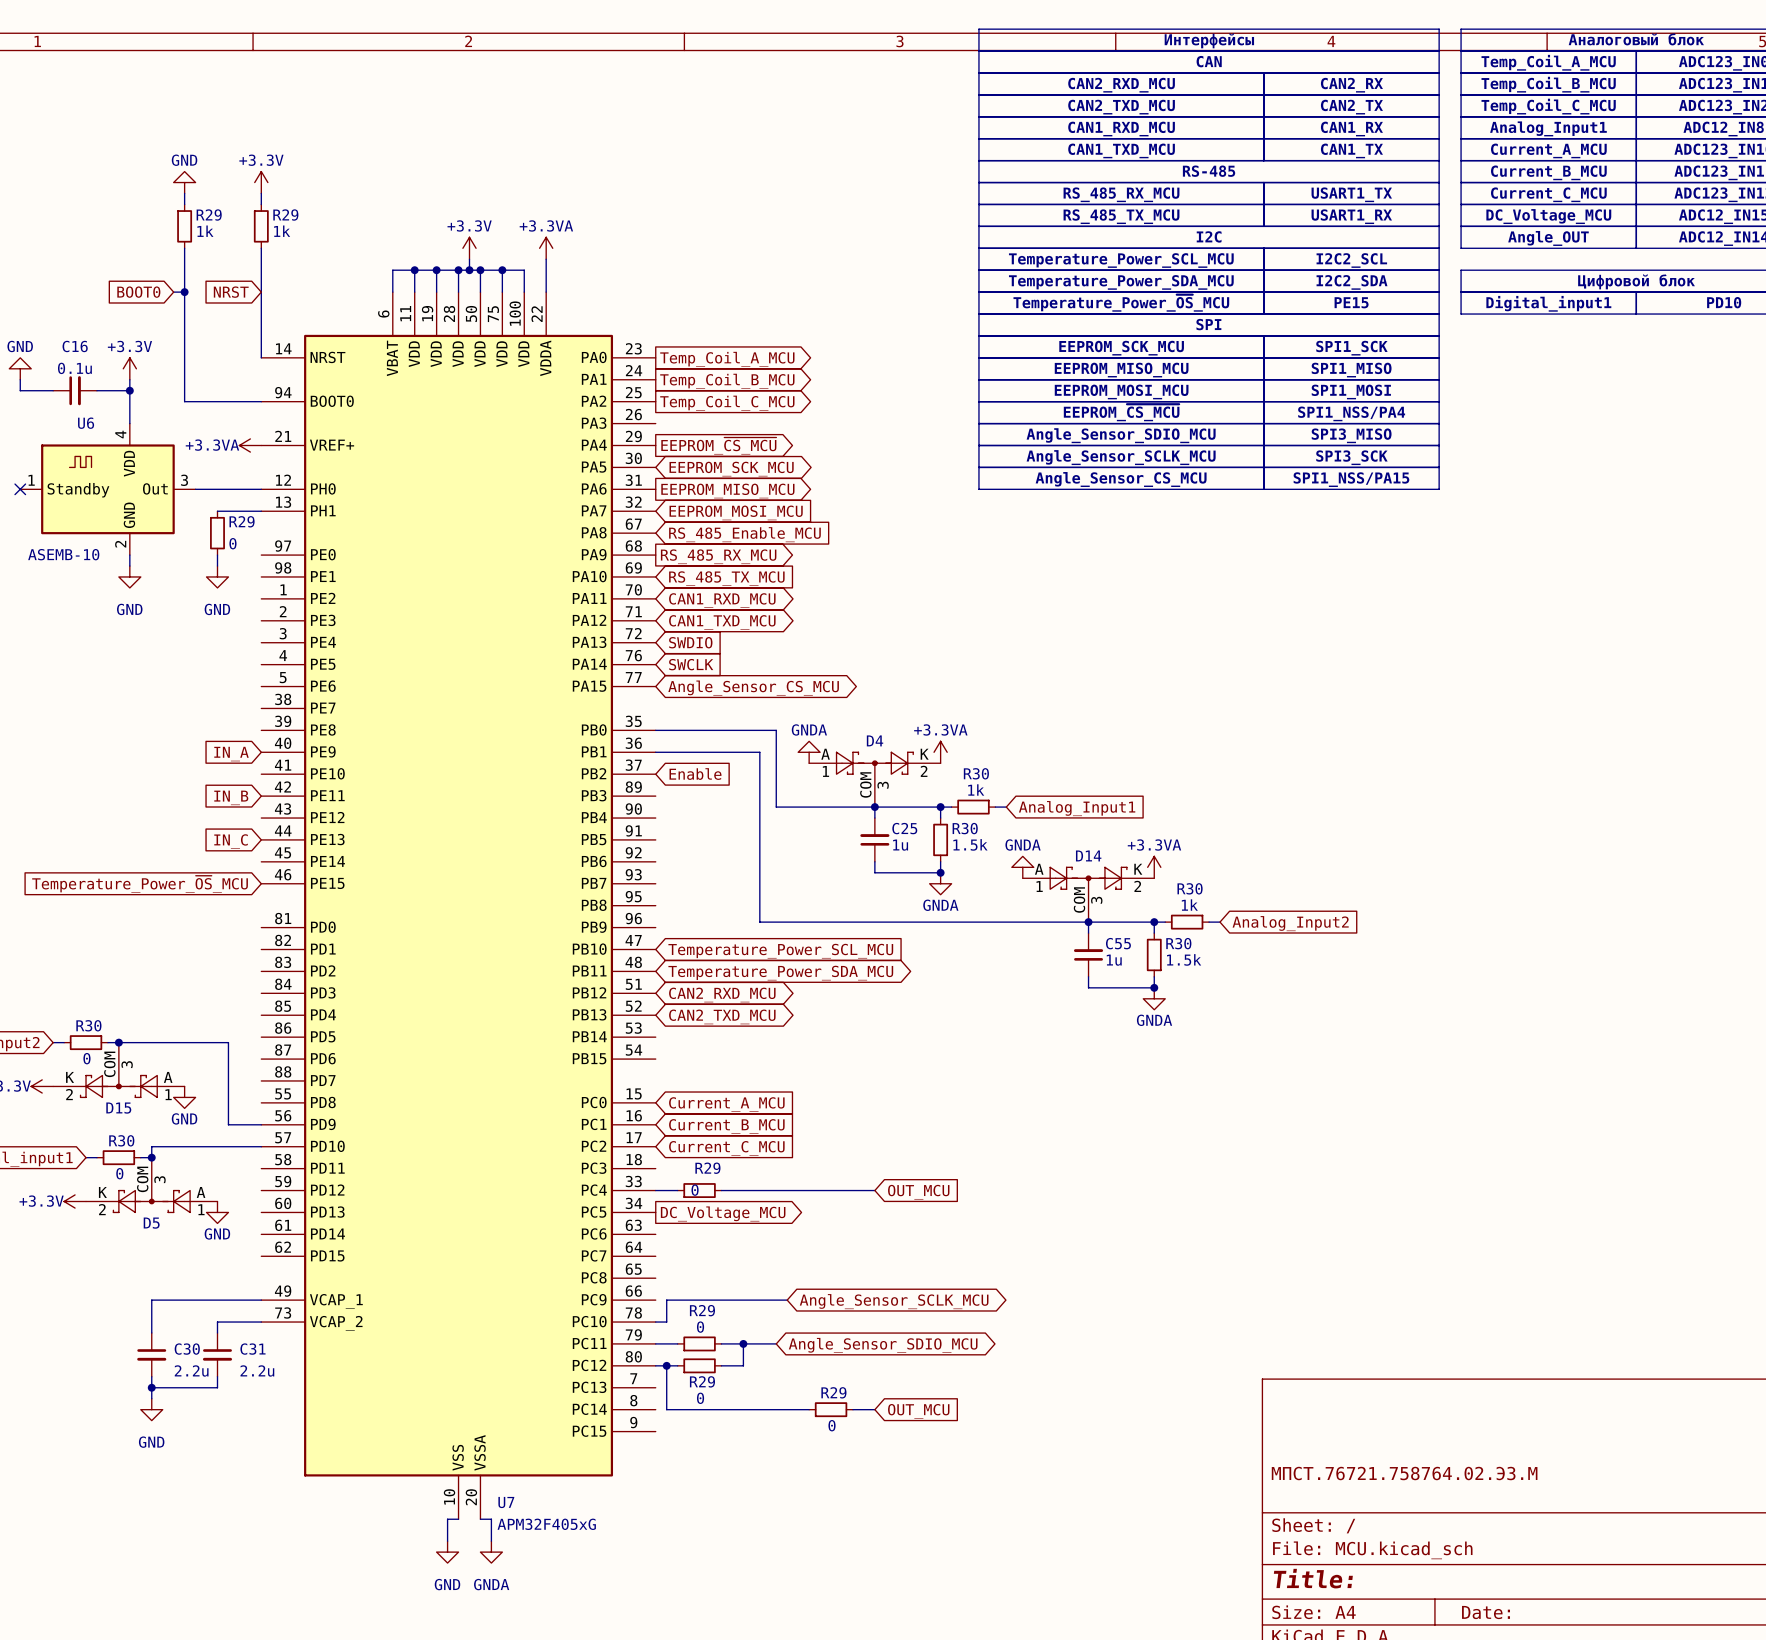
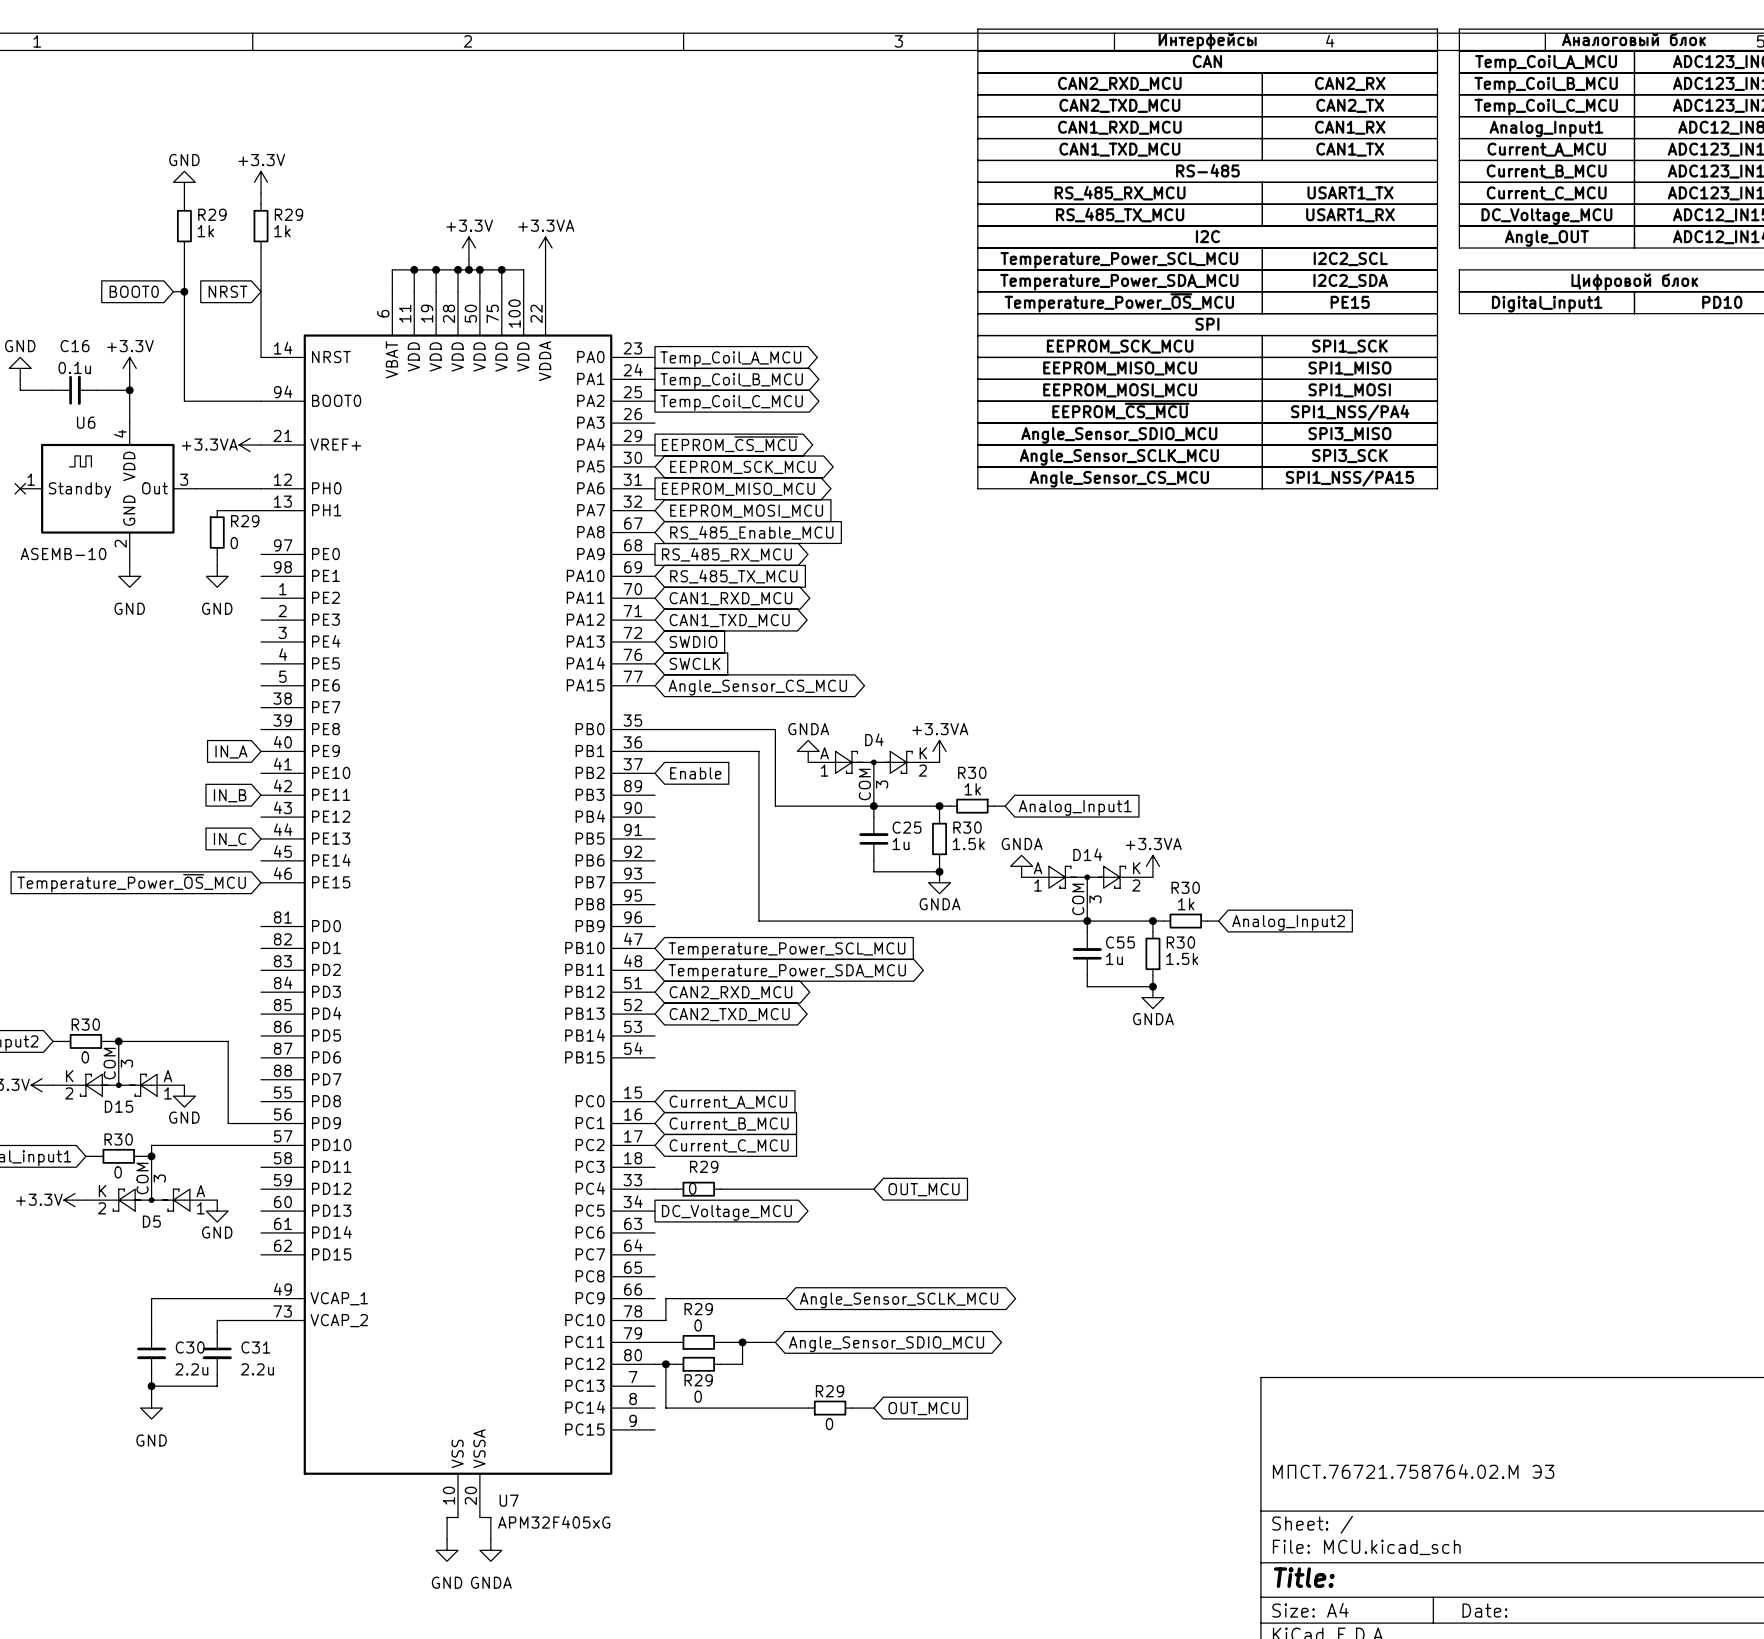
title block: МПСТ.76721.758764.02.Э3.М (1404, 1473) -> МПСТ.76721.758764.02.М Э3 (1413, 1471)

